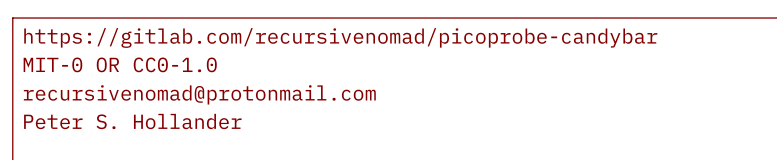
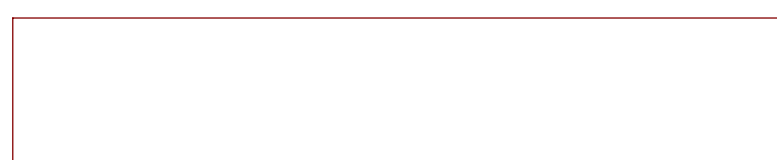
title block: https://gitlab.com/recursivenomad/picoprobe-candybar (340, 37) -> none
title block: MIT-0 OR CC0-1.0 (120, 64) -> none
title block: recursivenomad@protonmail.com (199, 94) -> none
title block: Peter S. Hollander (132, 121) -> none

